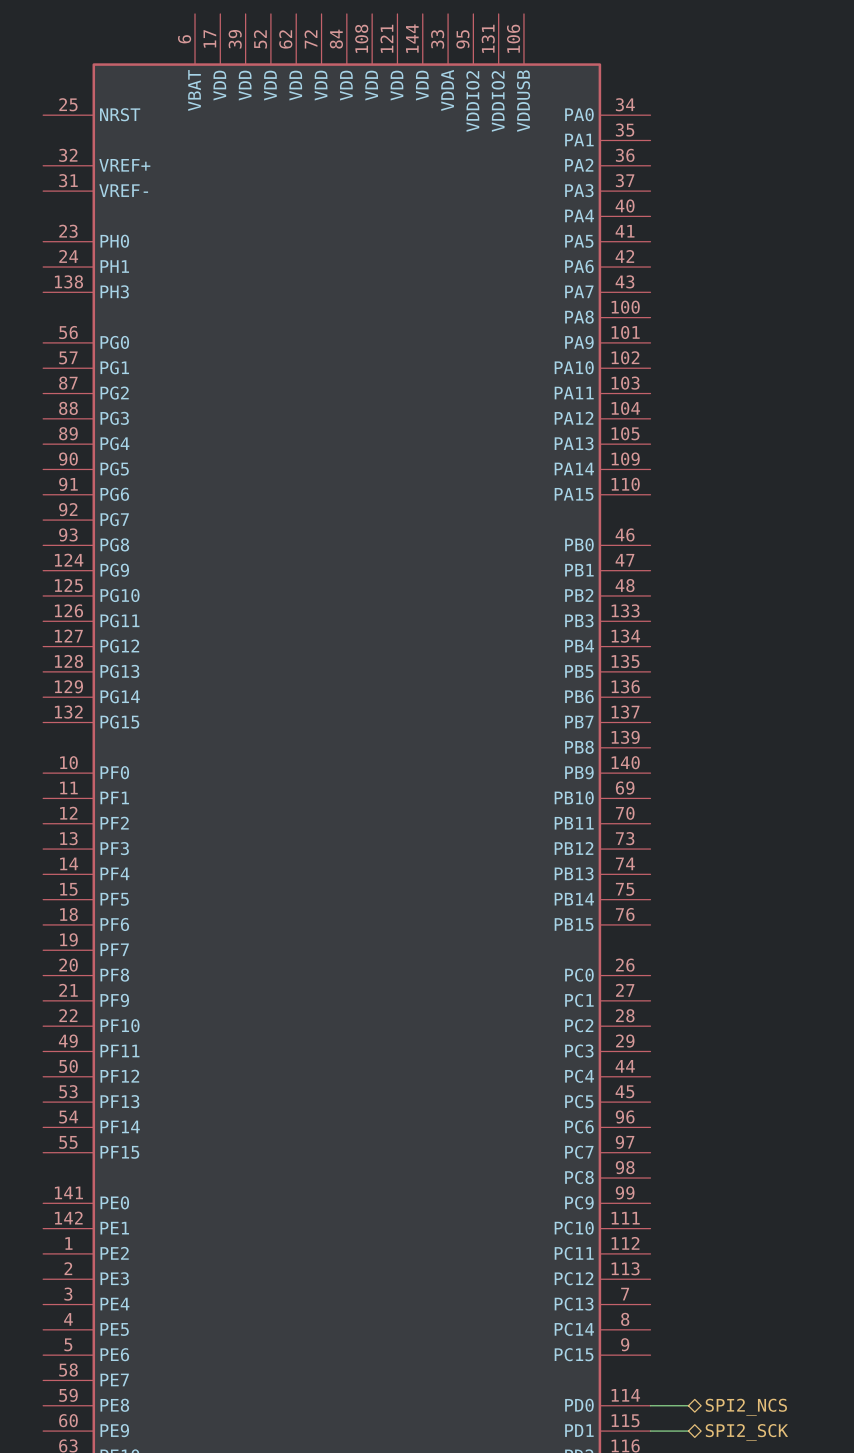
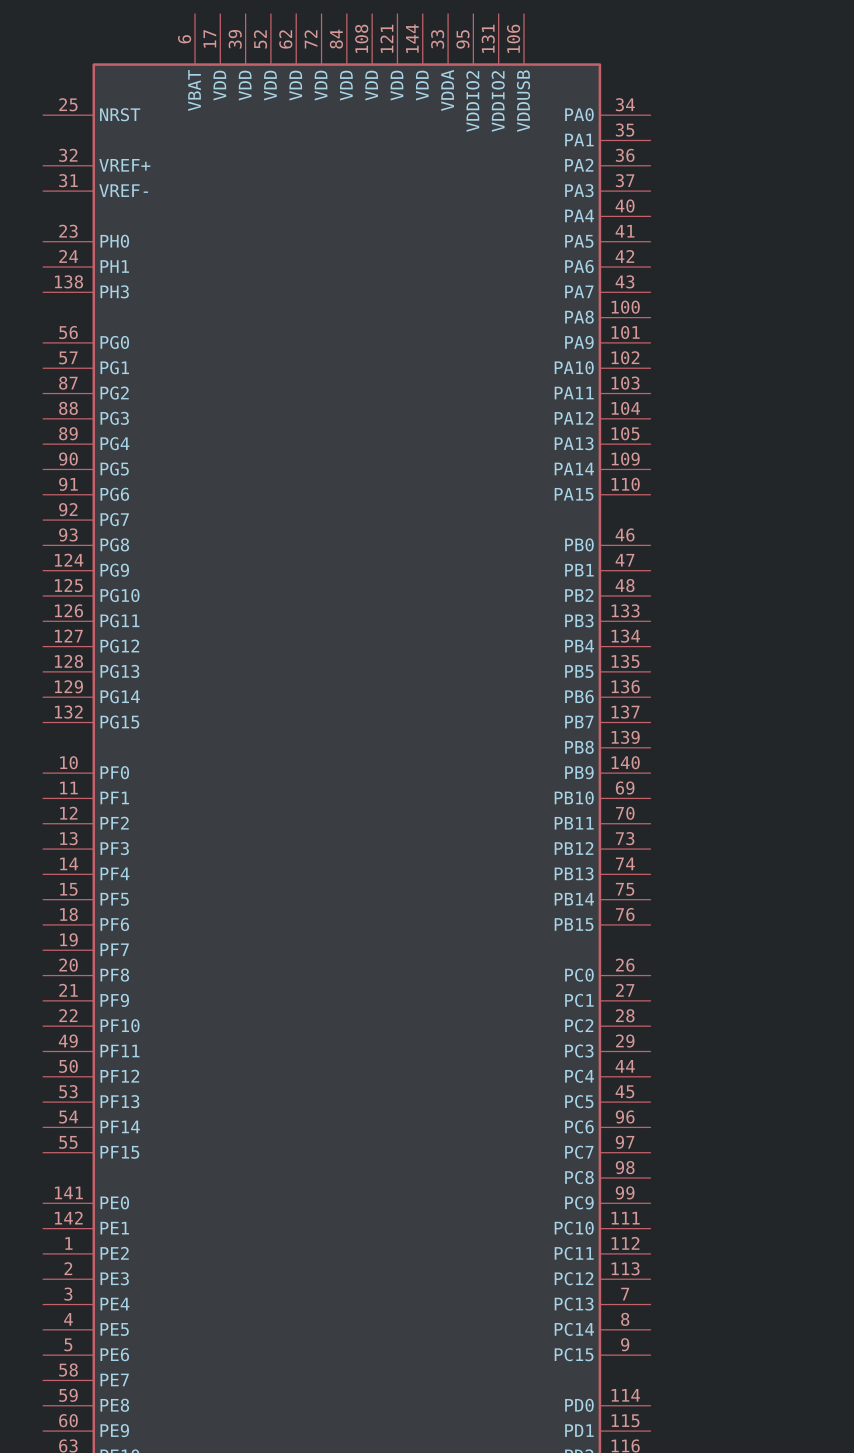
wire: (650, 1405) (688, 1405) -> none
hierarchical label: SPI2_NCS (746, 1407) -> none
wire: (650, 1431) (688, 1431) -> none
hierarchical label: SPI2_SCK (746, 1432) -> none

